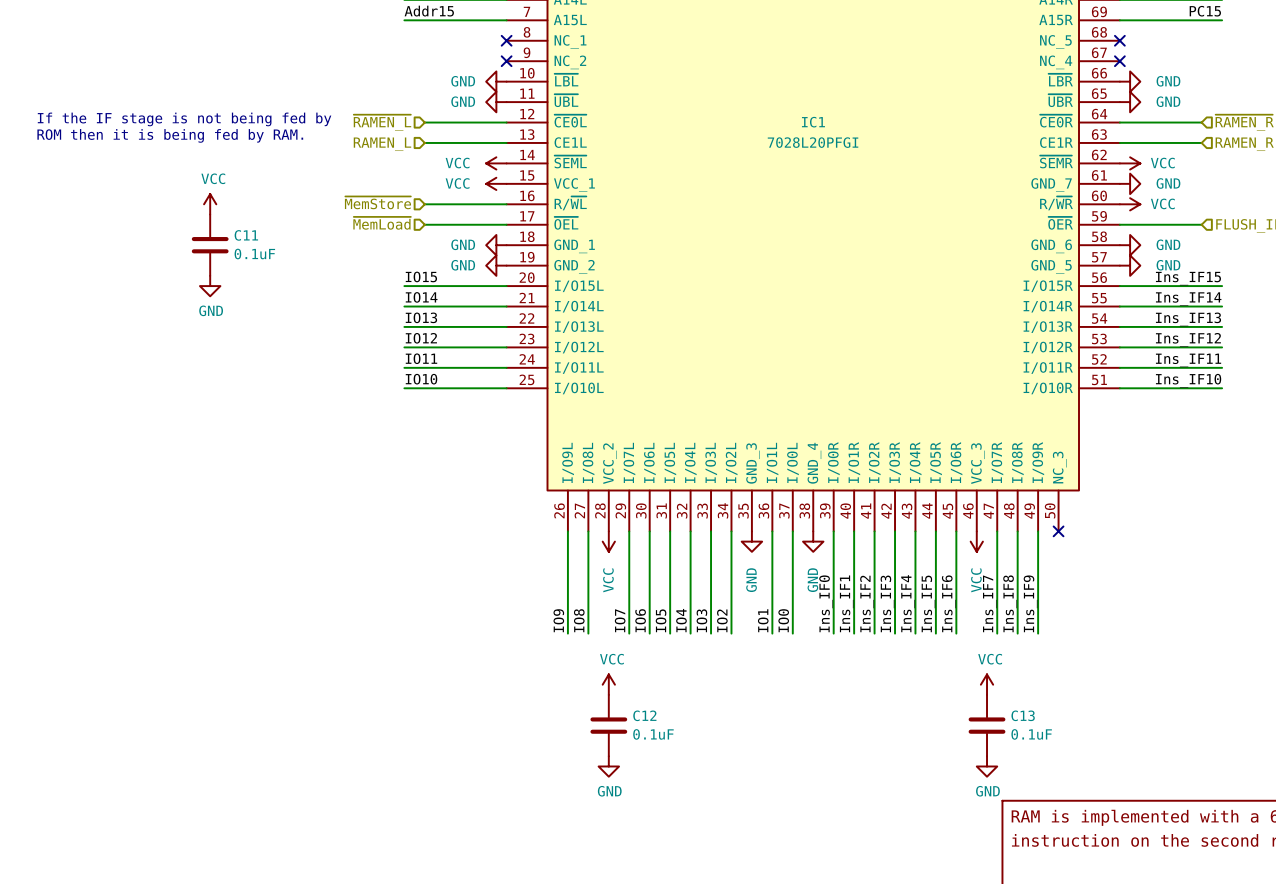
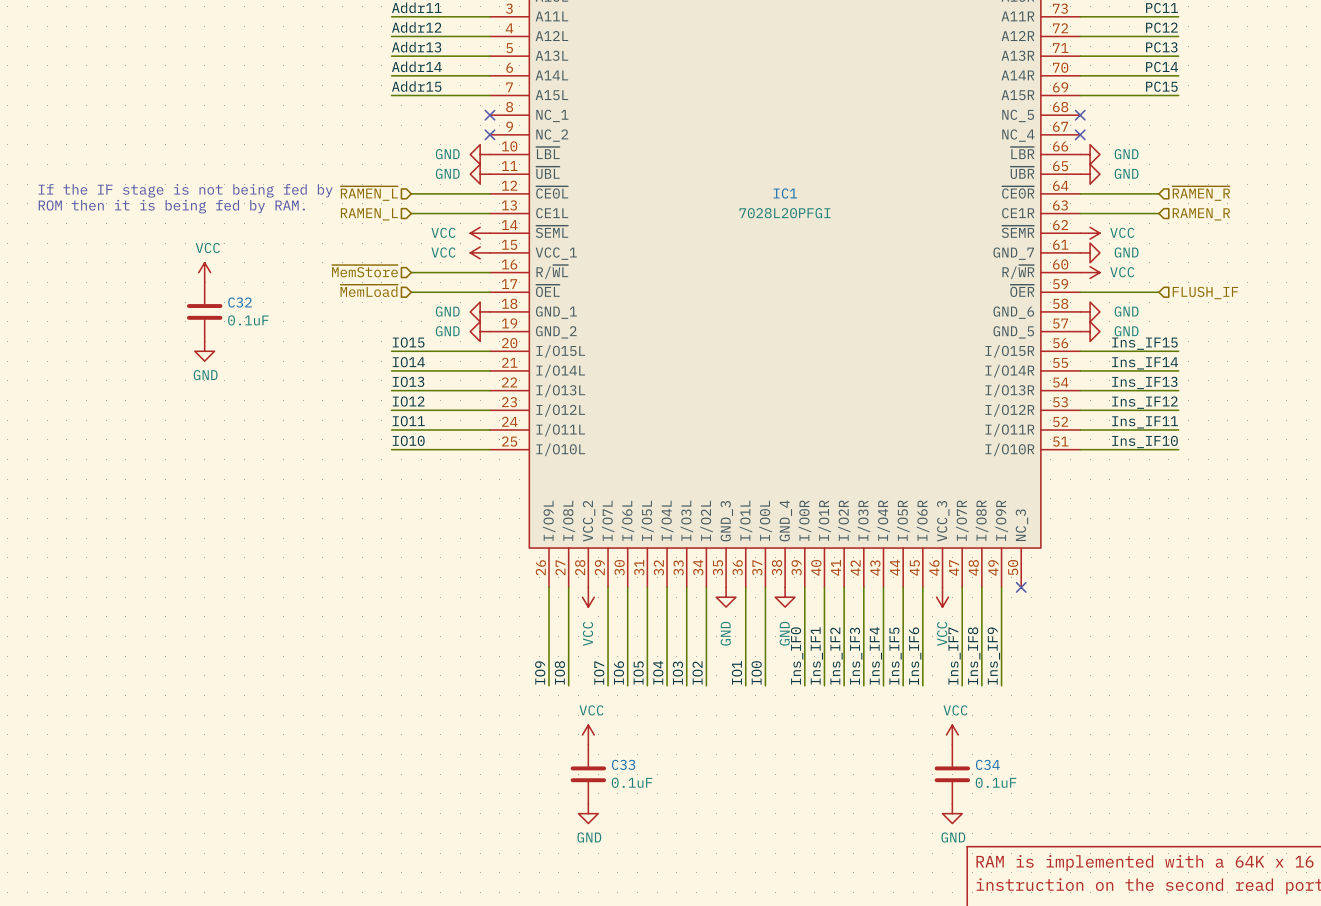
C11 name: C11 (246, 235) -> C32 (240, 302)
C12 name: C12 (644, 715) -> C33 (623, 764)
C13 name: C13 (1023, 715) -> C34 (987, 764)

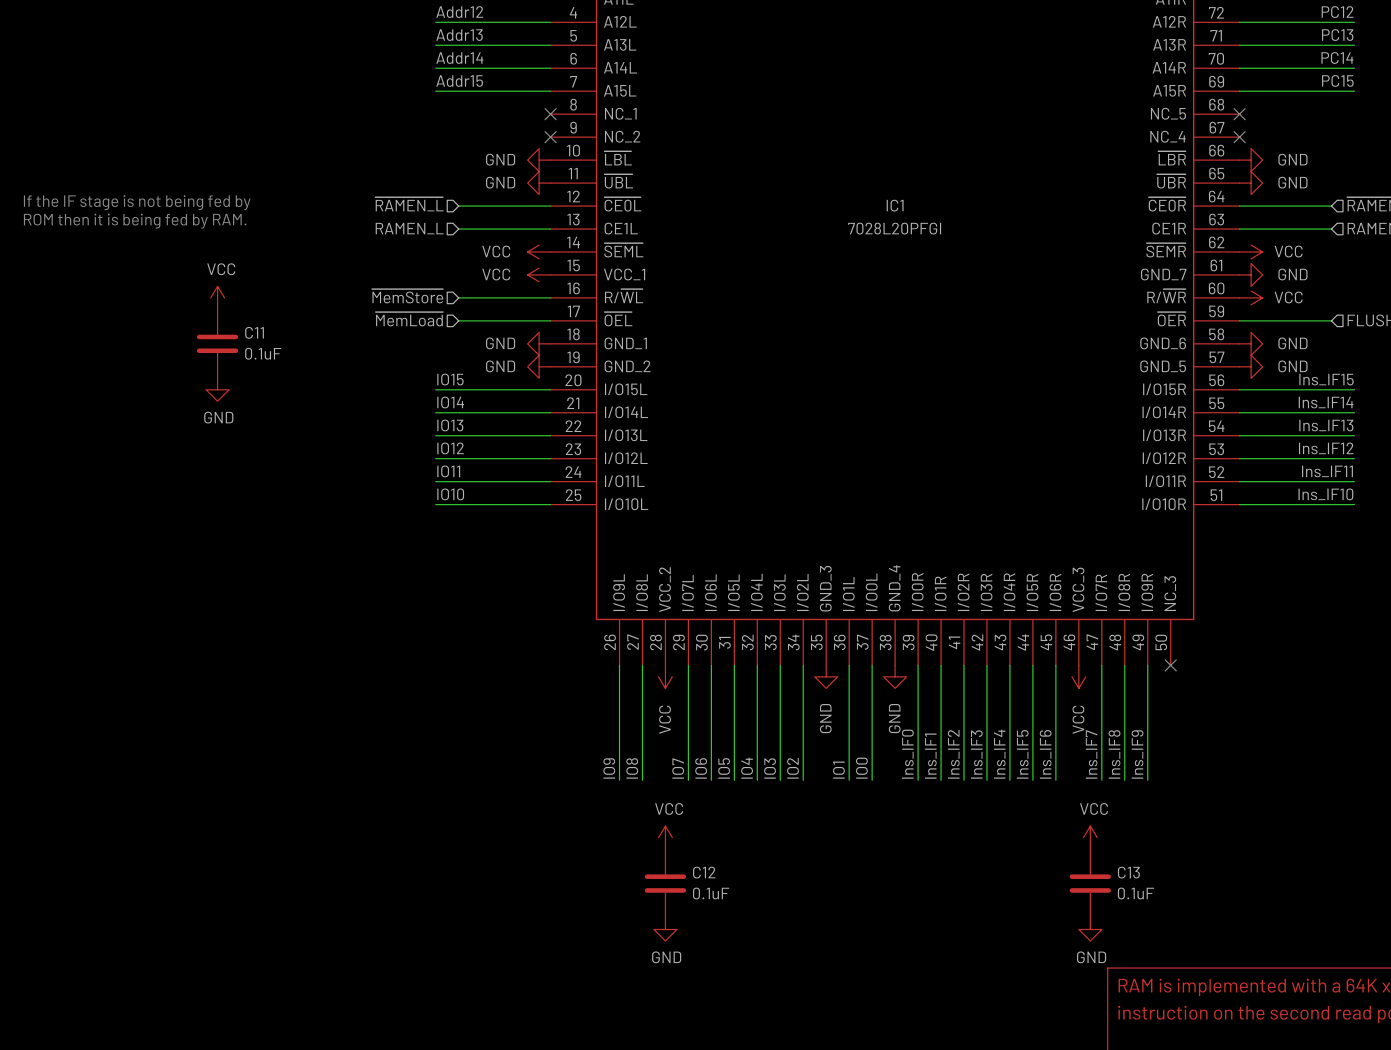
C32 name: C32 (240, 302) -> C11 (254, 332)
C33 name: C33 (623, 764) -> C12 (704, 872)
C34 name: C34 (987, 764) -> C13 (1128, 872)

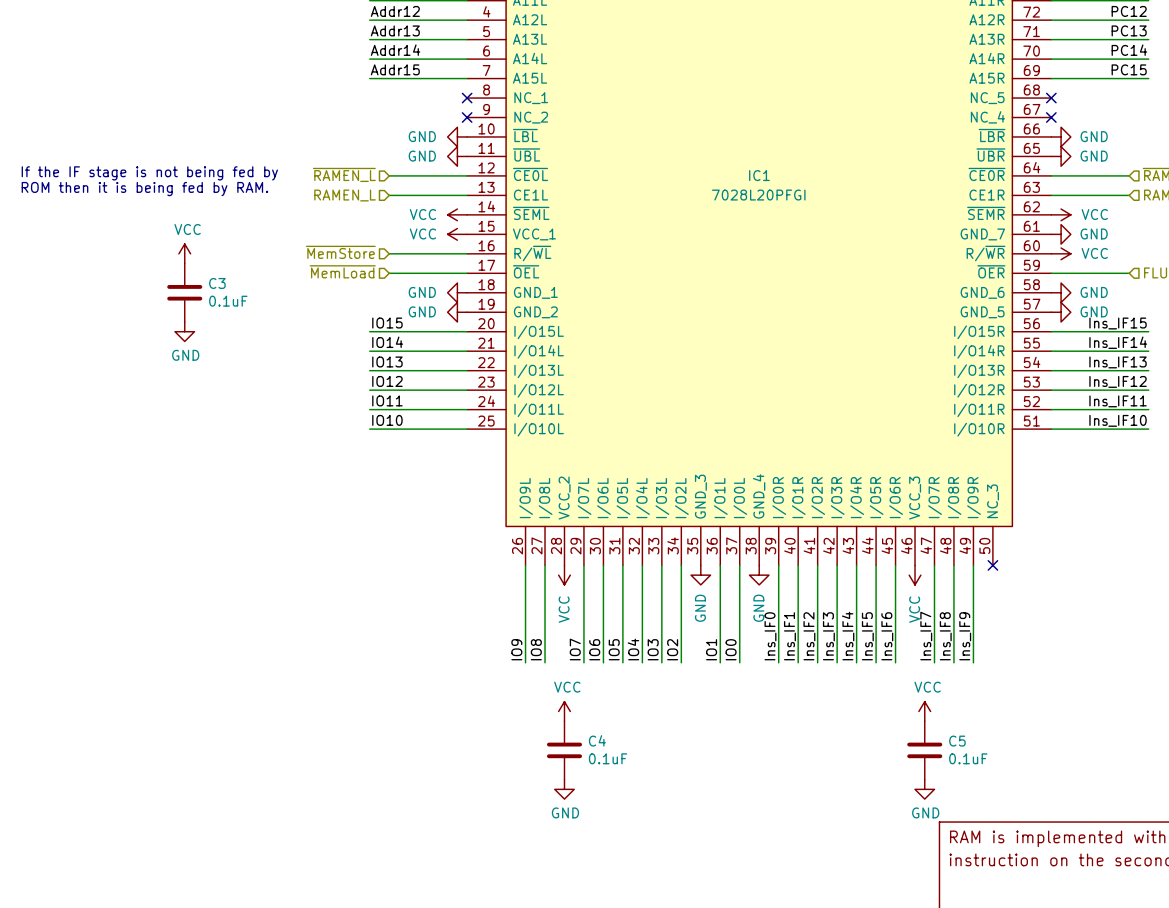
C11 name: C11 (254, 332) -> C3 (217, 283)
C12 name: C12 (704, 872) -> C4 (597, 740)
C13 name: C13 (1128, 872) -> C5 (957, 741)

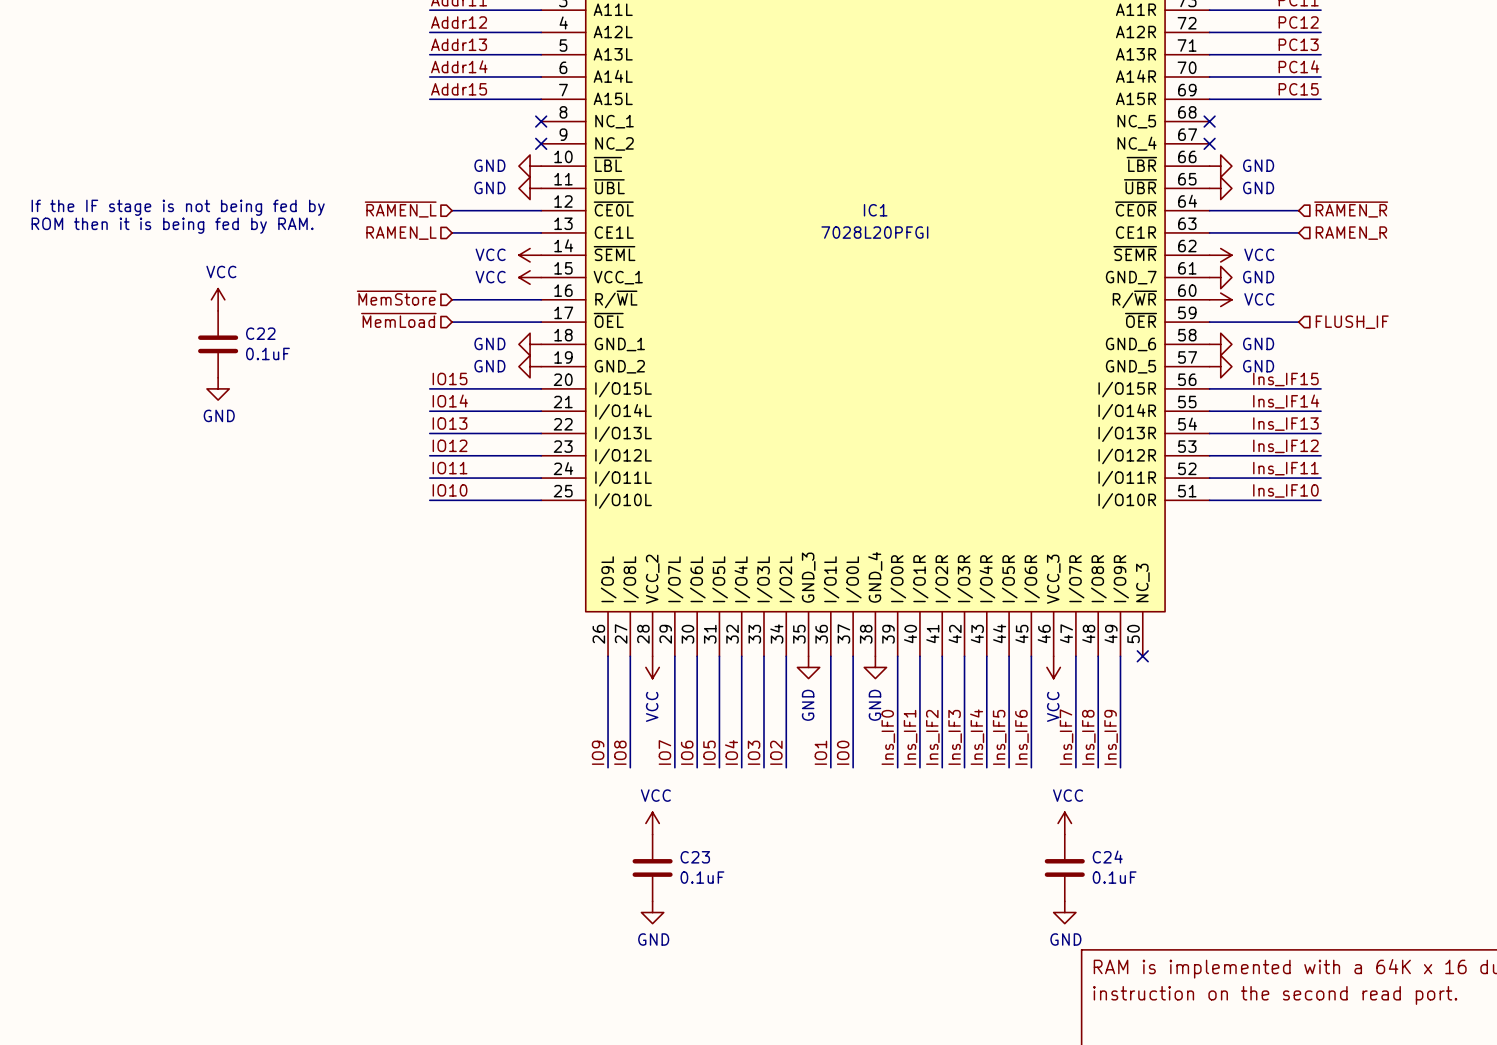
C3 name: C3 (217, 283) -> C22 (260, 333)
C4 name: C4 (597, 740) -> C23 (695, 857)
C5 name: C5 (957, 741) -> C24 (1107, 857)

